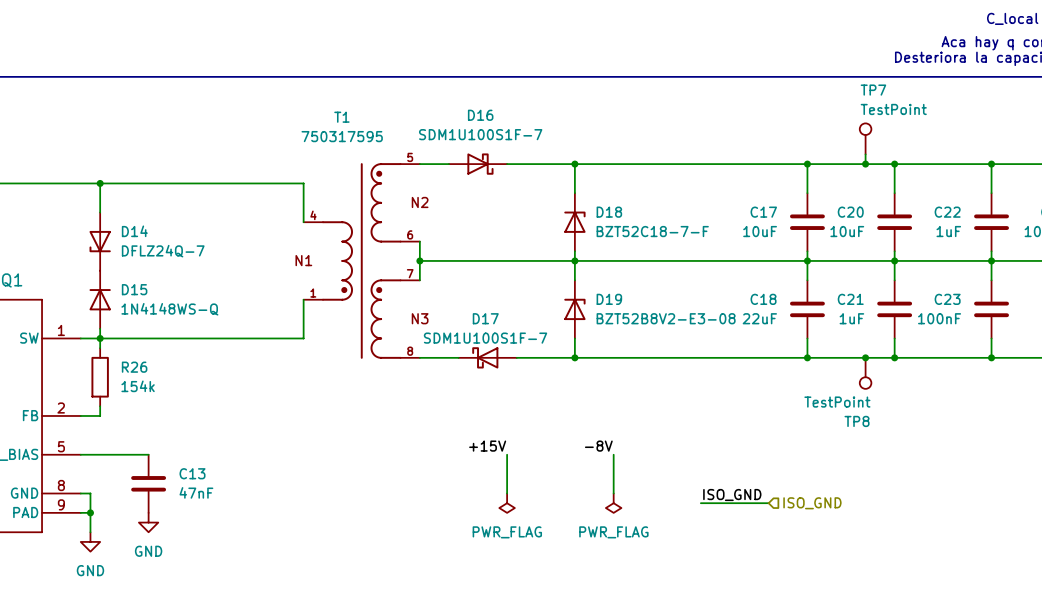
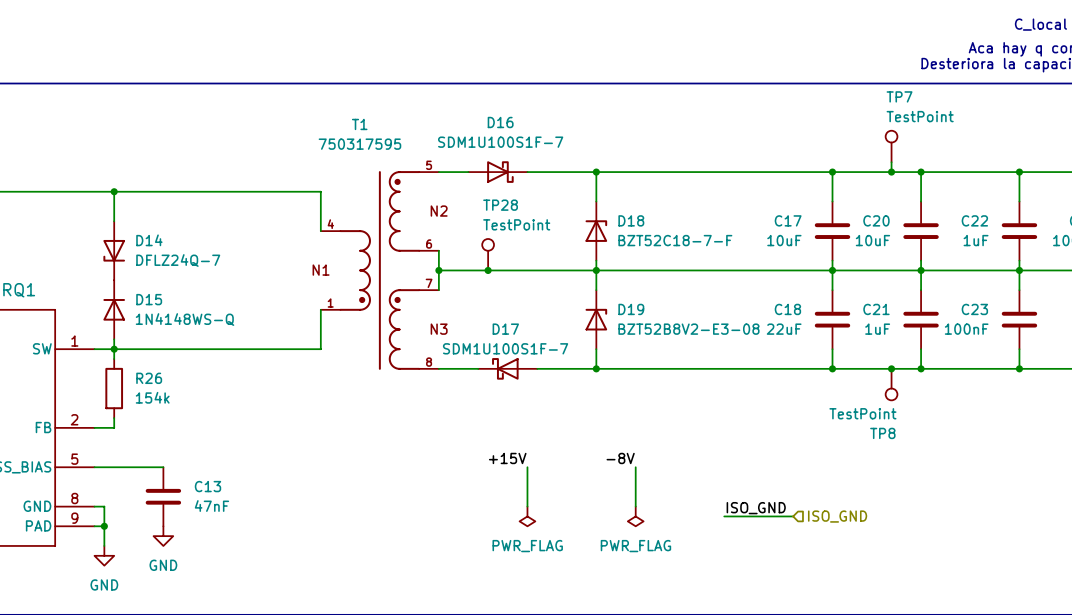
TP28: none -> TestPoint (488, 254)
junction: none -> (488, 270)

